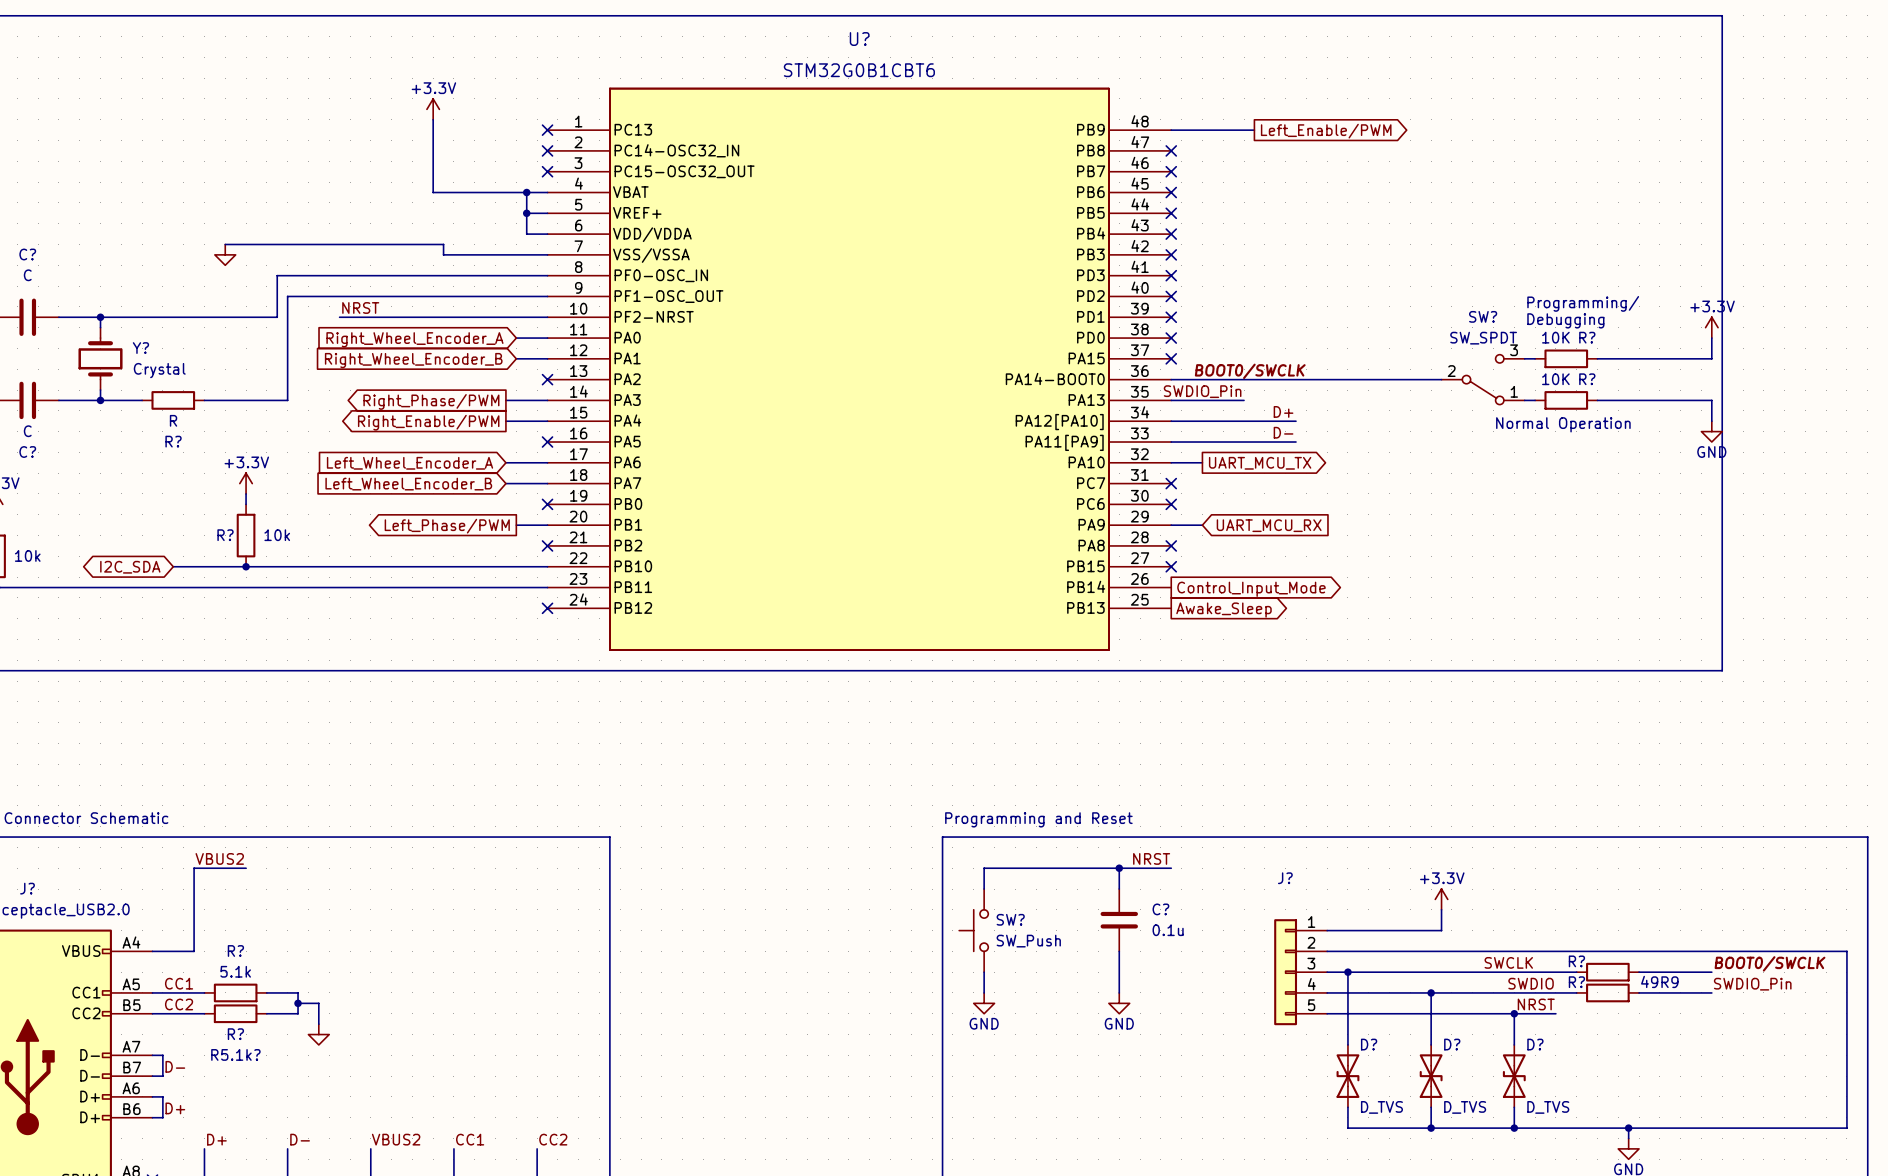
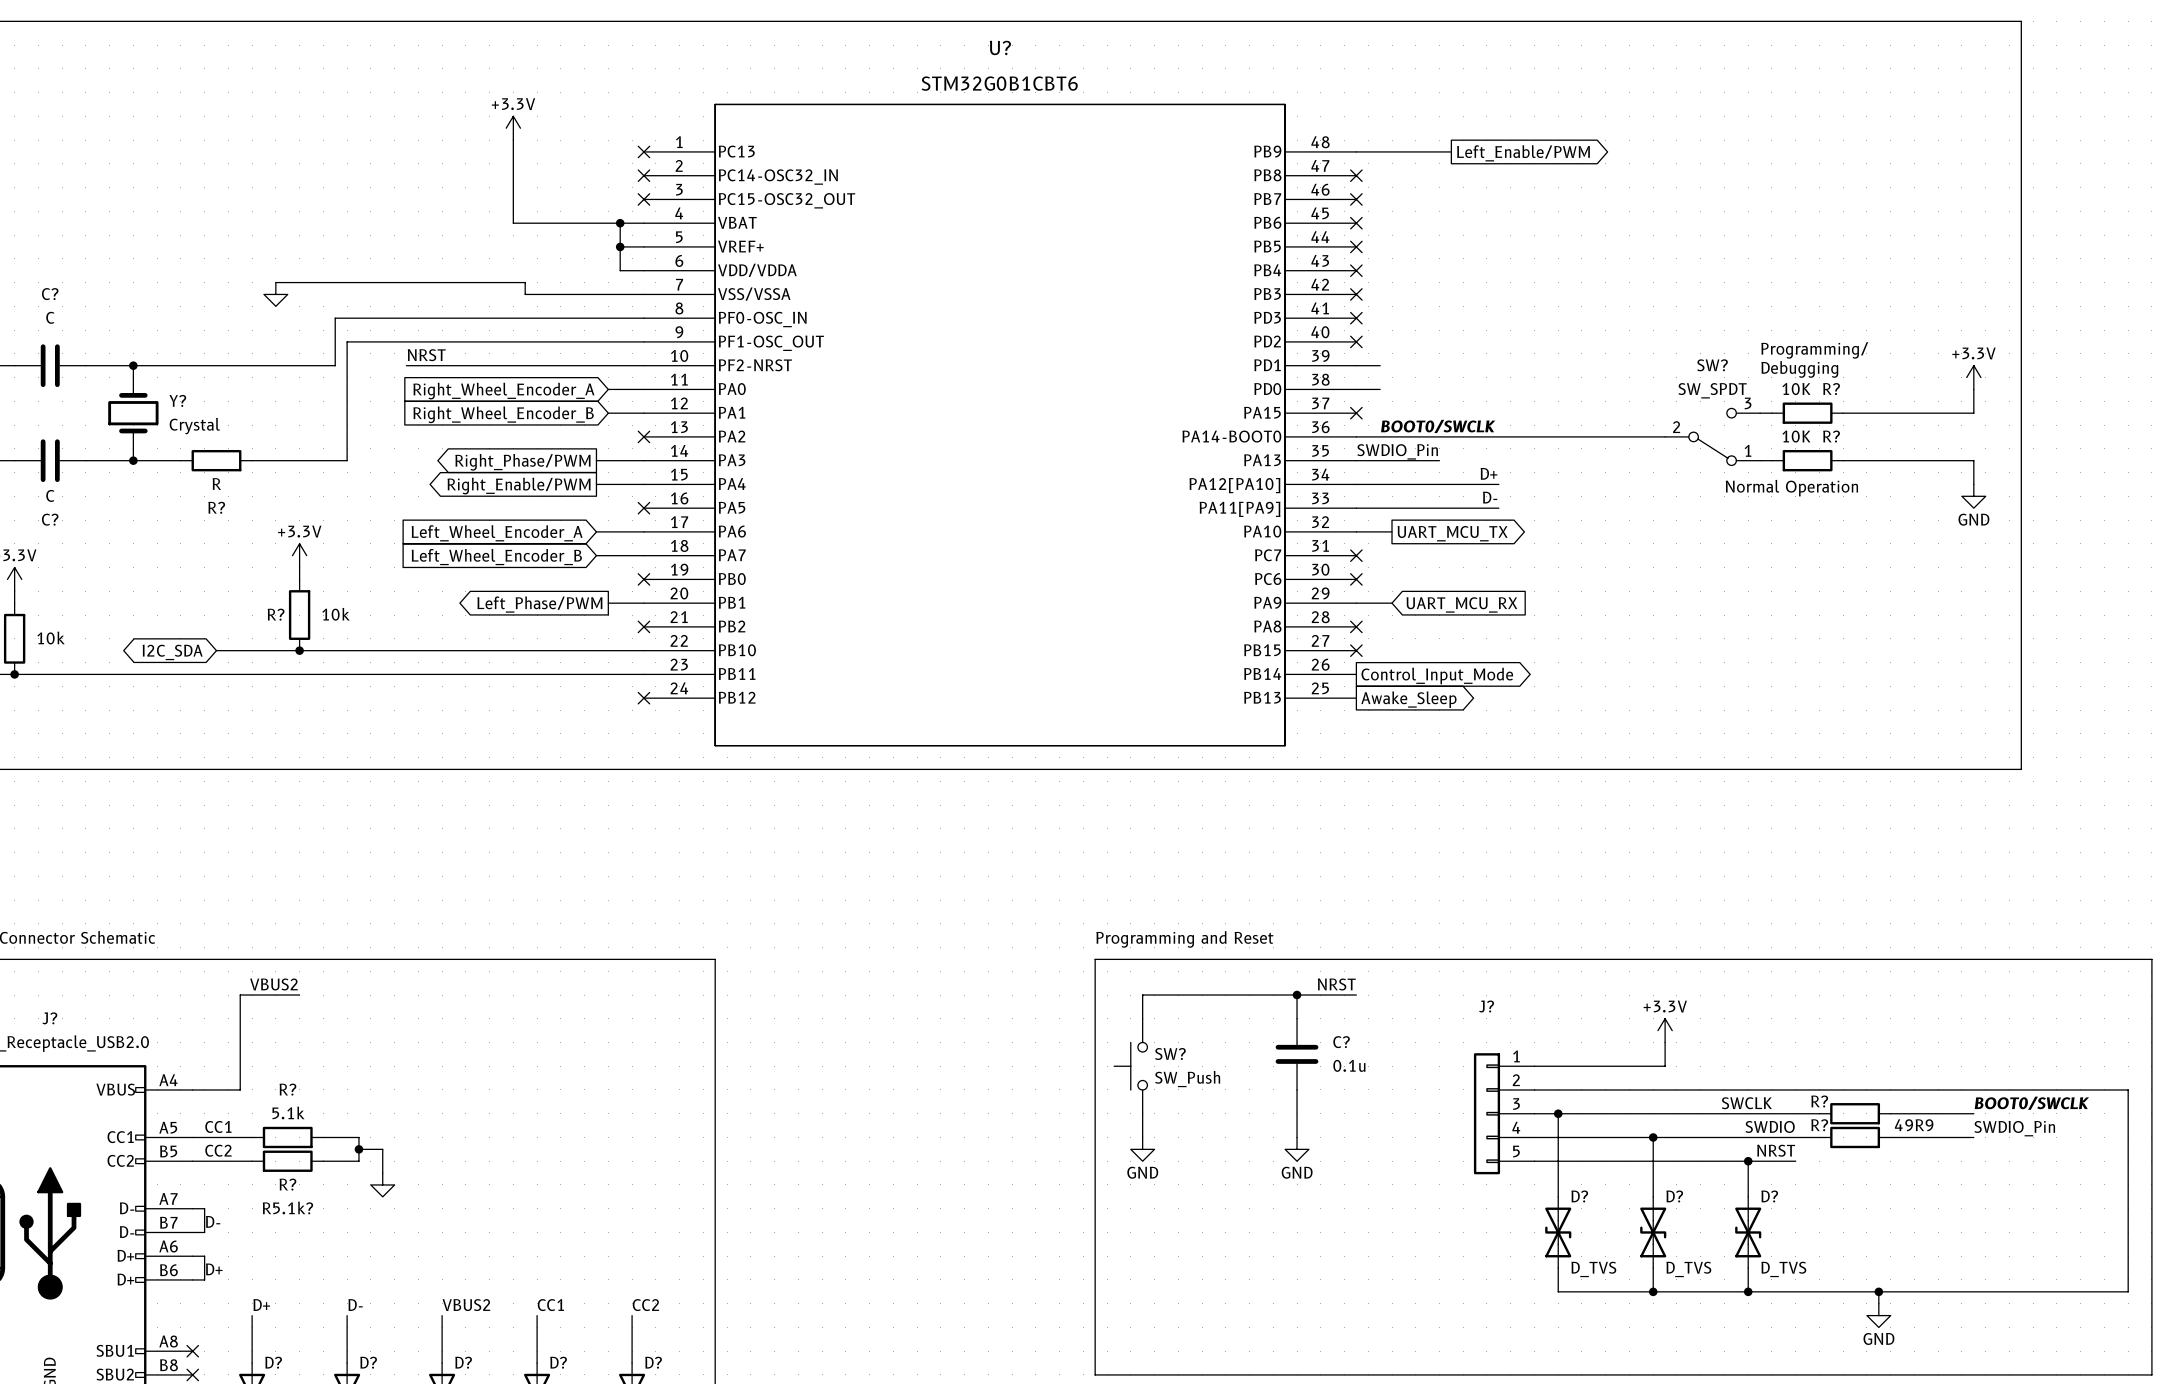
line: (1722, 15) (1722, 670) -> (1985, 21) (2021, 21) (2021, 769) (1985, 769)
wire: none -> (1356, 365) (1380, 365)
no-connect mark: (1171, 317) -> none
wire: none -> (1356, 389) (1380, 389)
no-connect mark: (1171, 338) -> none

